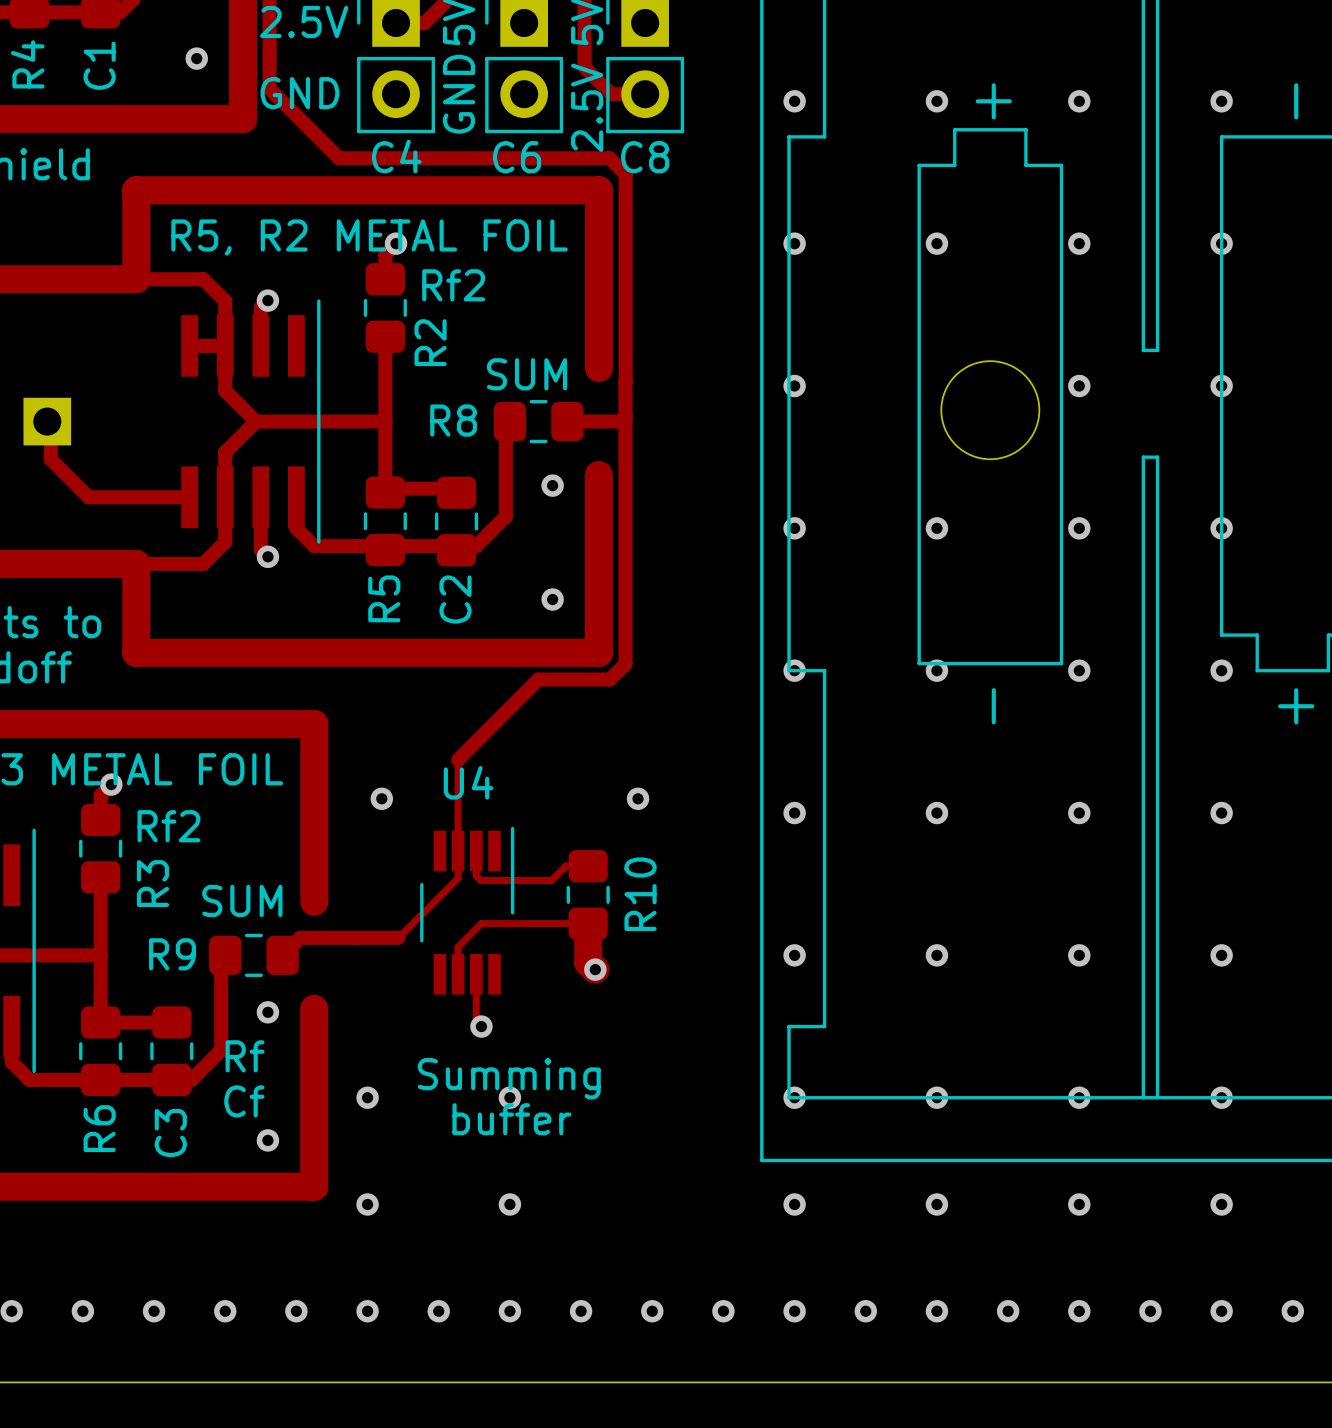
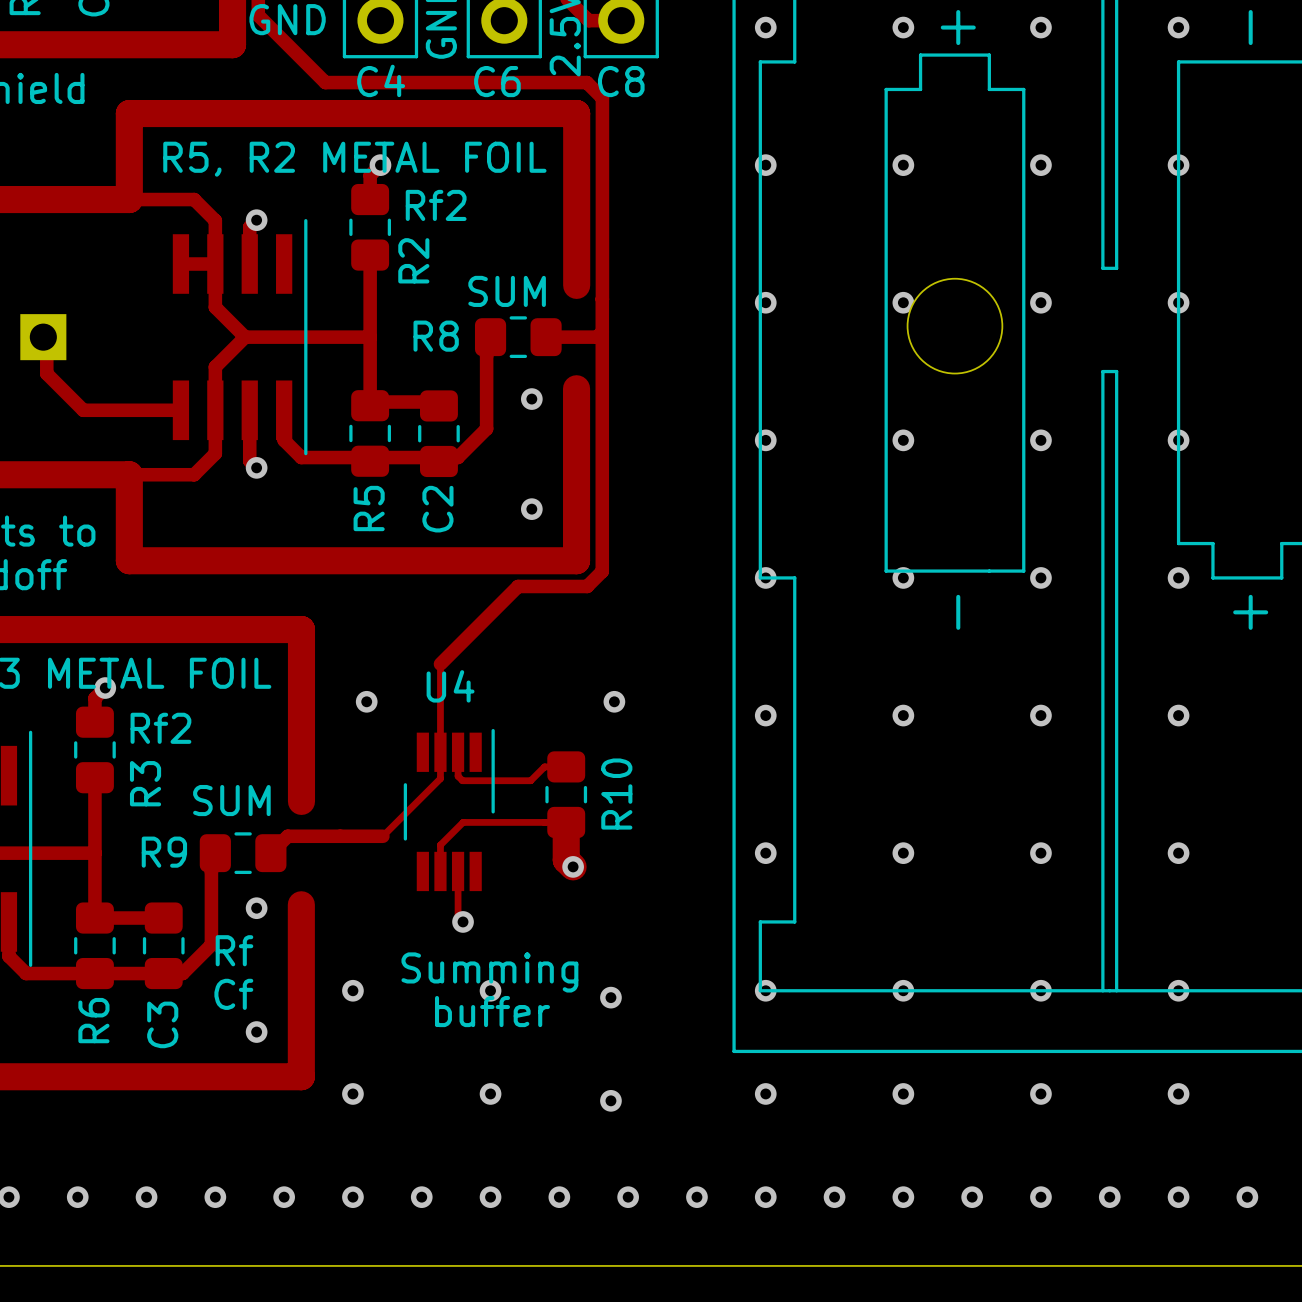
via: none -> (903, 302)
via: none -> (610, 997)
via: none -> (610, 1100)

